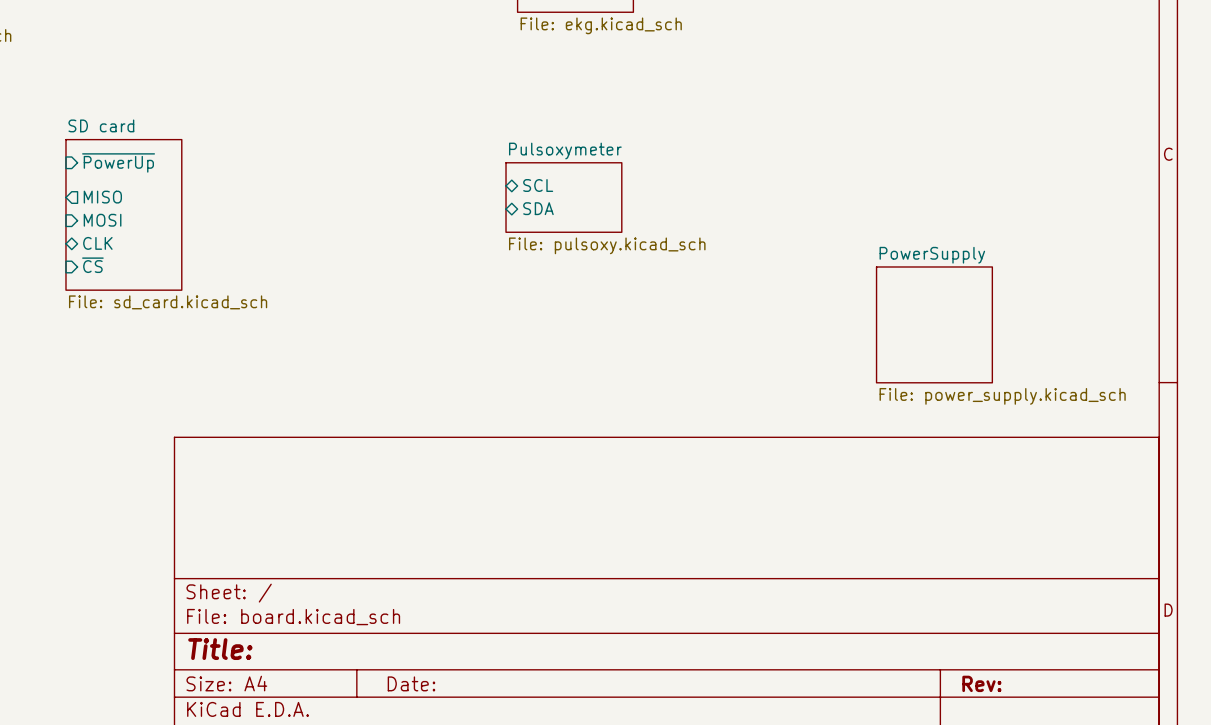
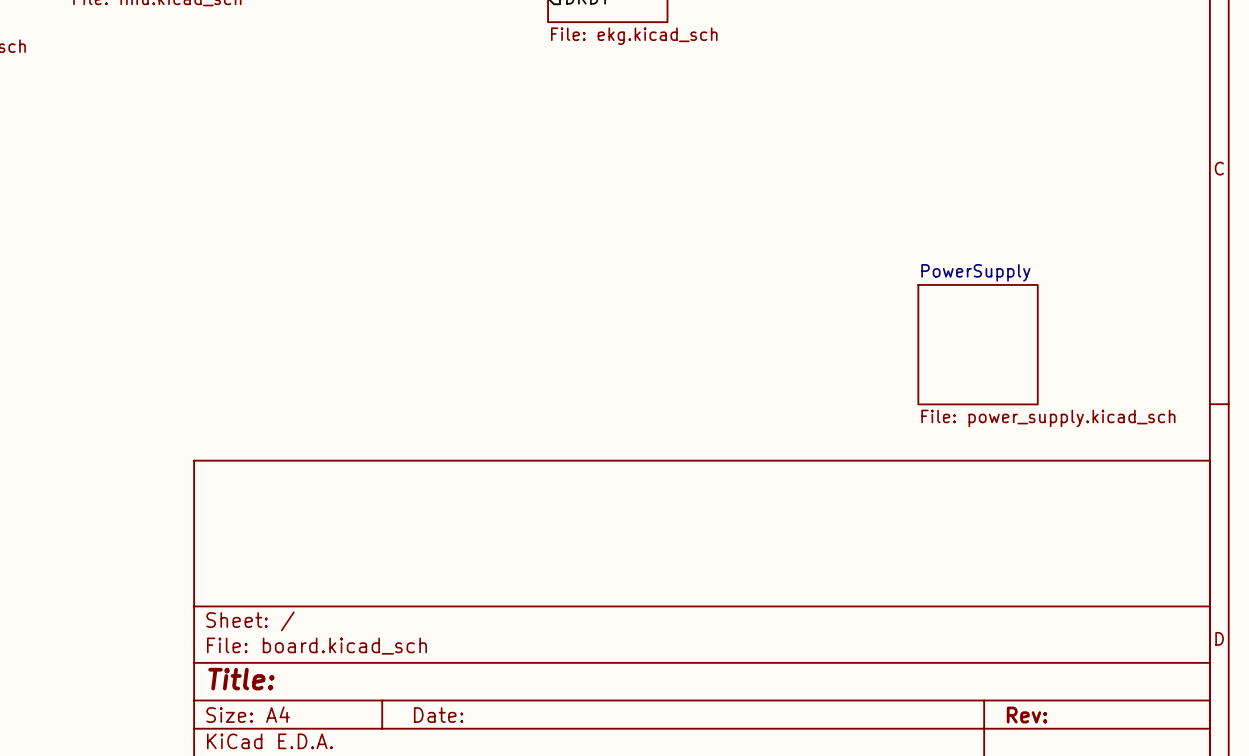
sheet pin: ~{PowerUp} (118, 162) -> none
sheet pin: SCL (538, 185) -> none
sheet pin: MISO (102, 197) -> none
sheet Pulsoxymeter: File: pulsoxy.kicad_sch (563, 197) -> none
sheet pin: SDA (538, 208) -> none
sheet SD card: File: sd_card.kicad_sch (123, 214) -> none
sheet pin: MOSI (102, 220) -> none
sheet pin: CLK (97, 243) -> none
sheet pin: ~{CS} (92, 265) -> none

